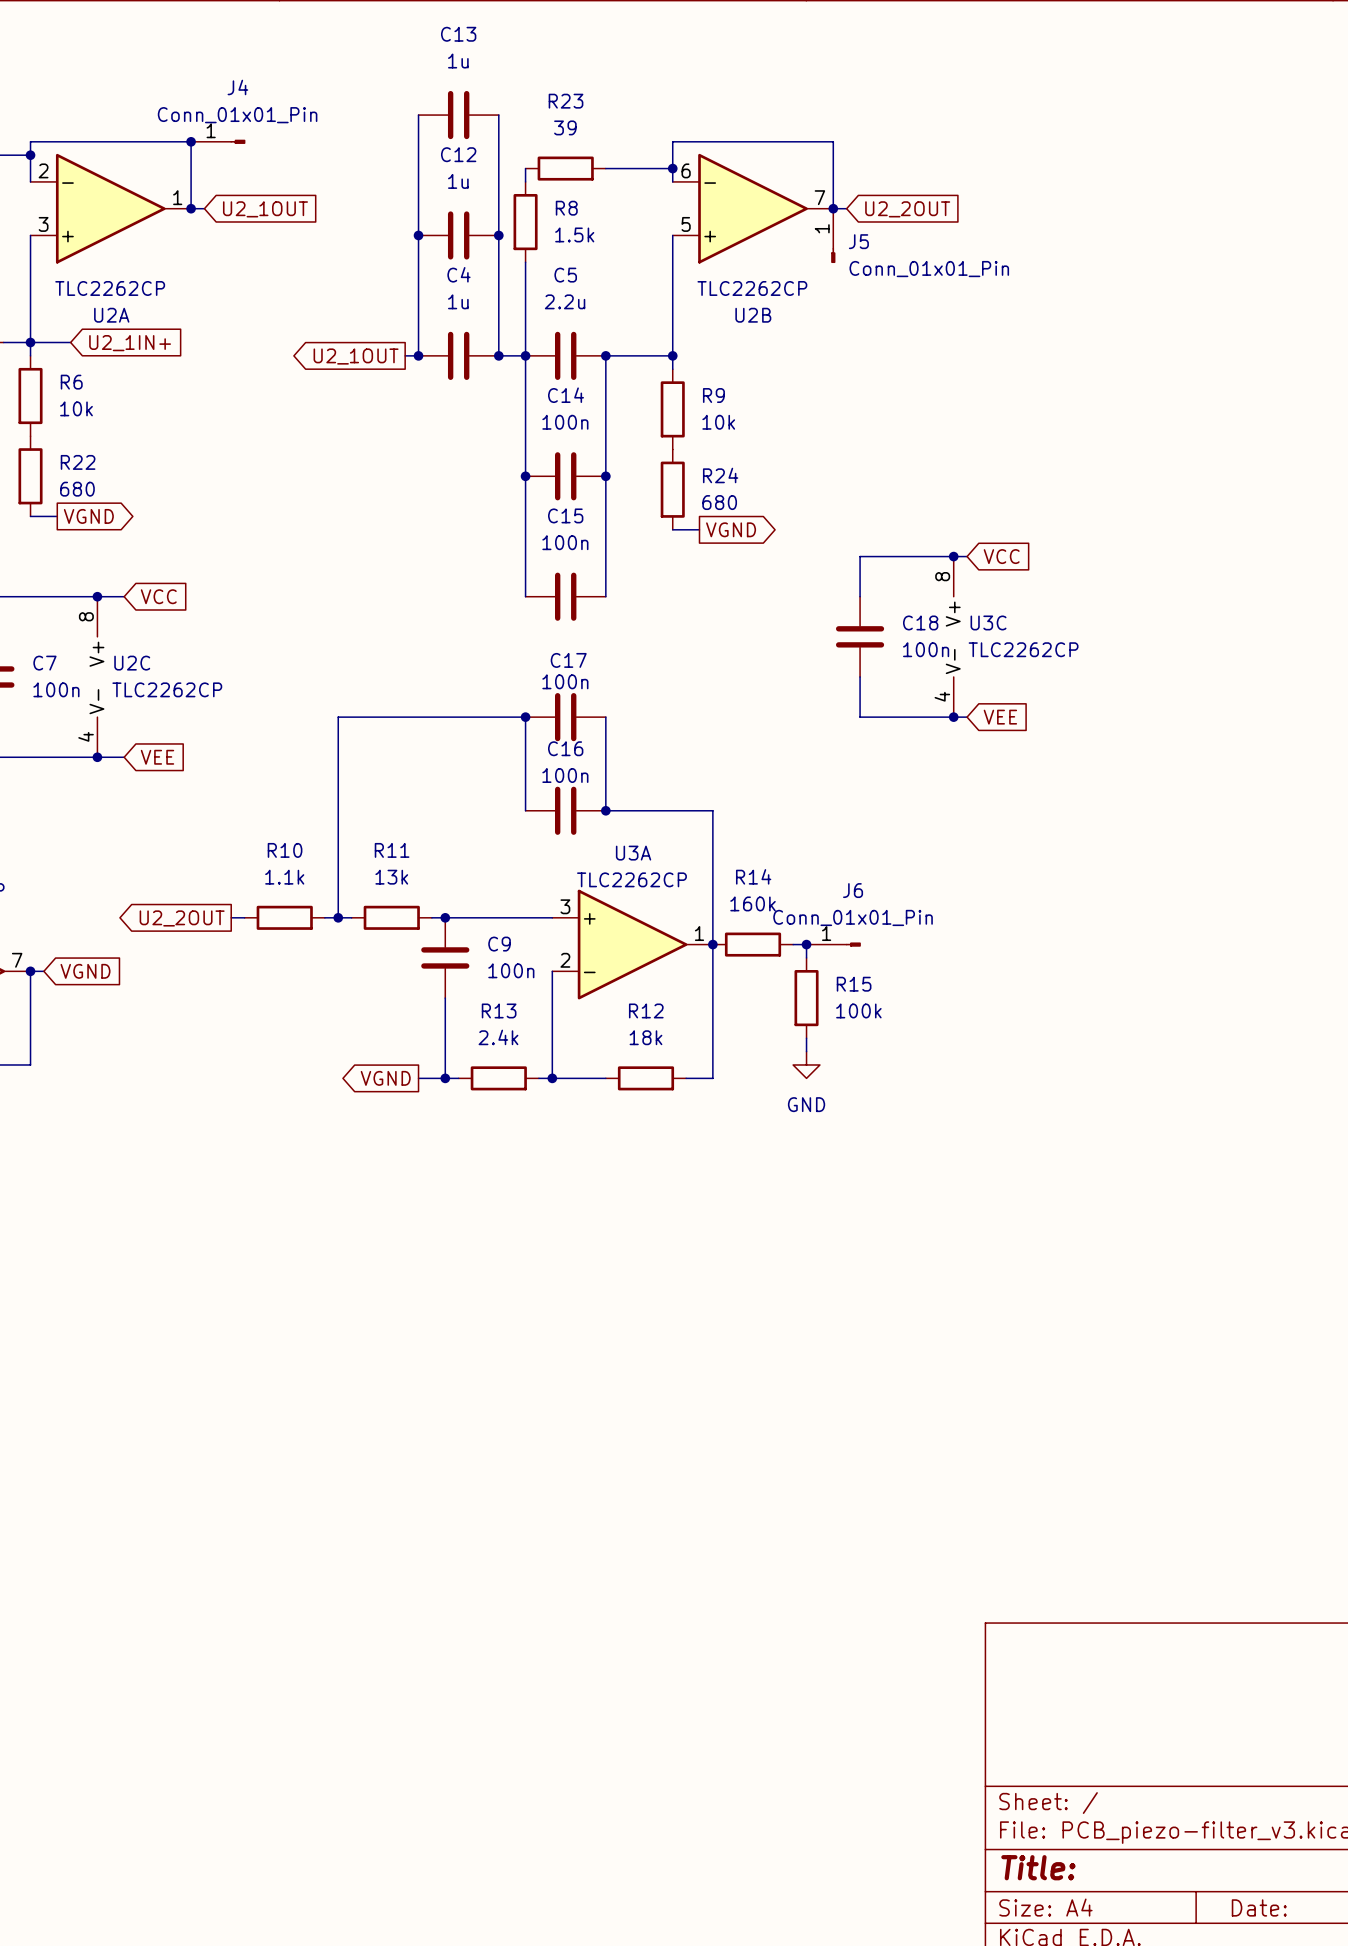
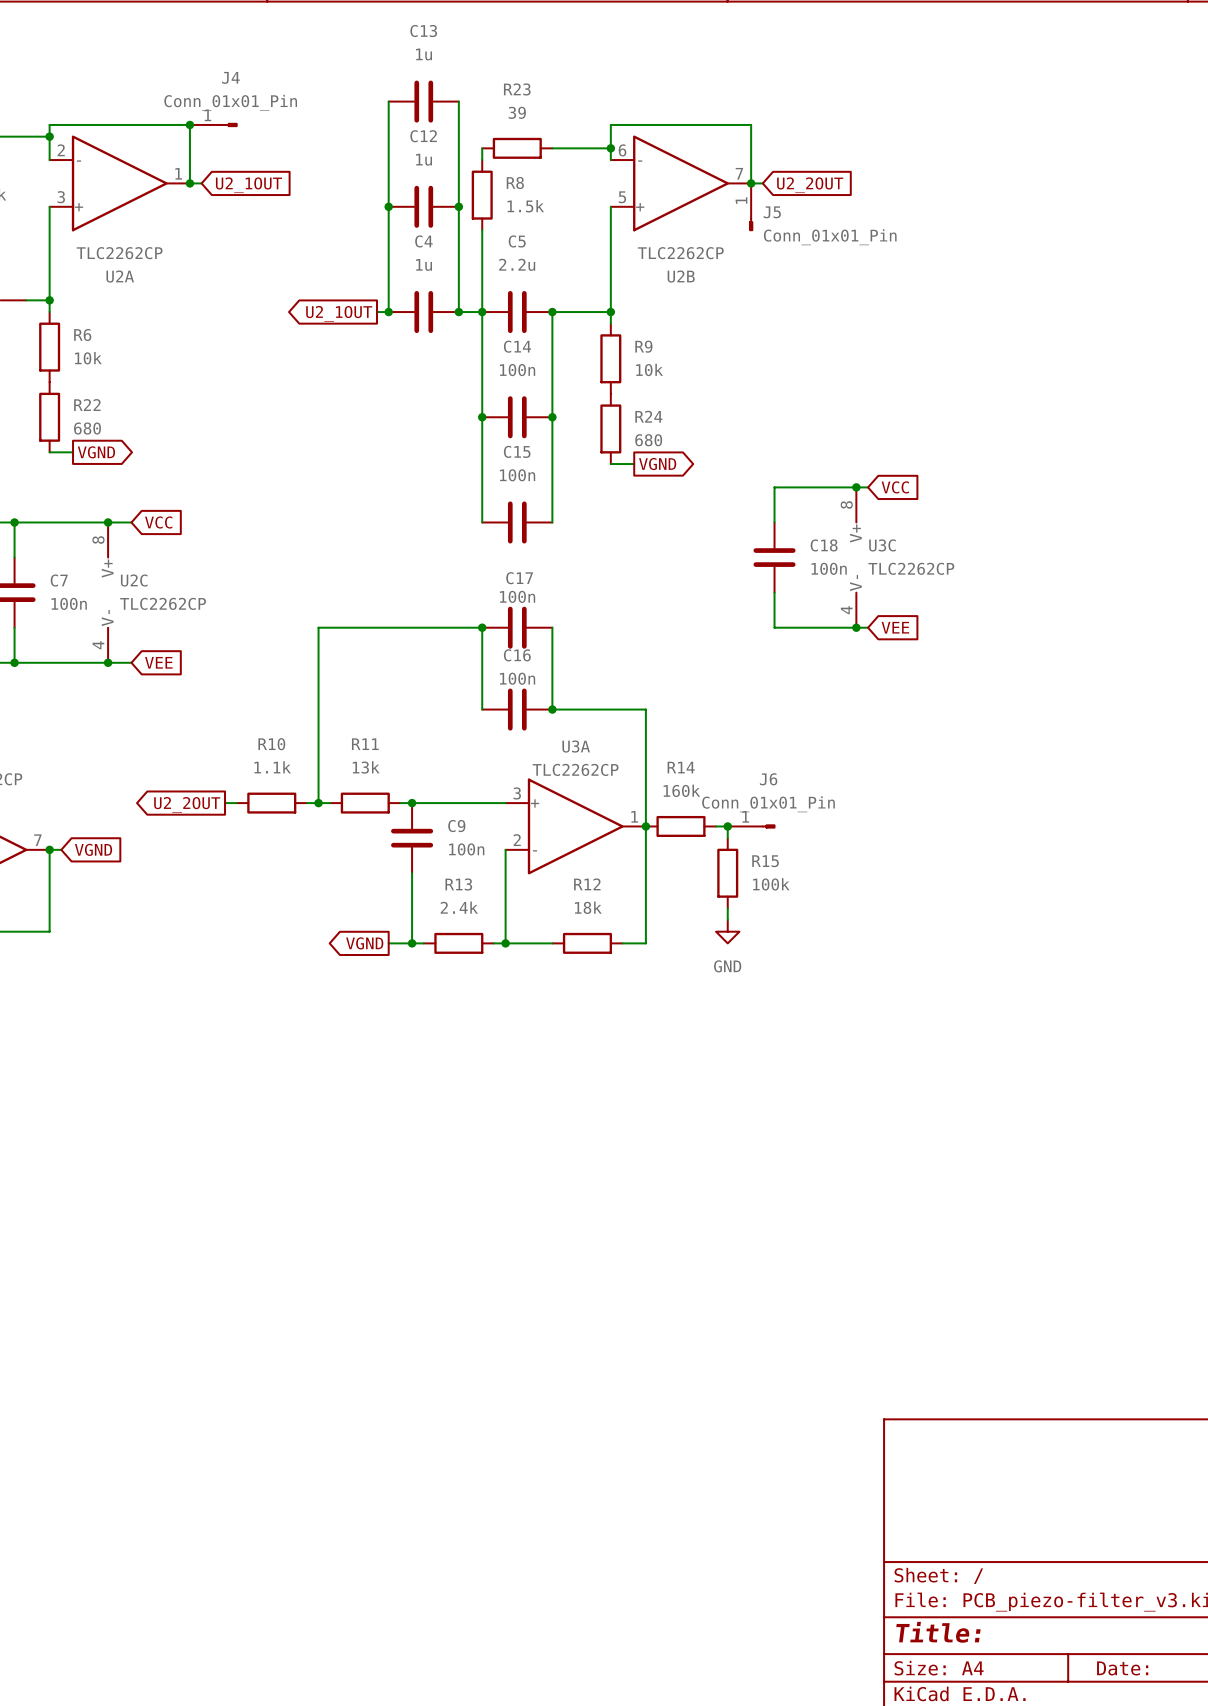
wire: (30, 342) (70, 342) -> none
global label: U2_1IN+ (130, 343) -> none

